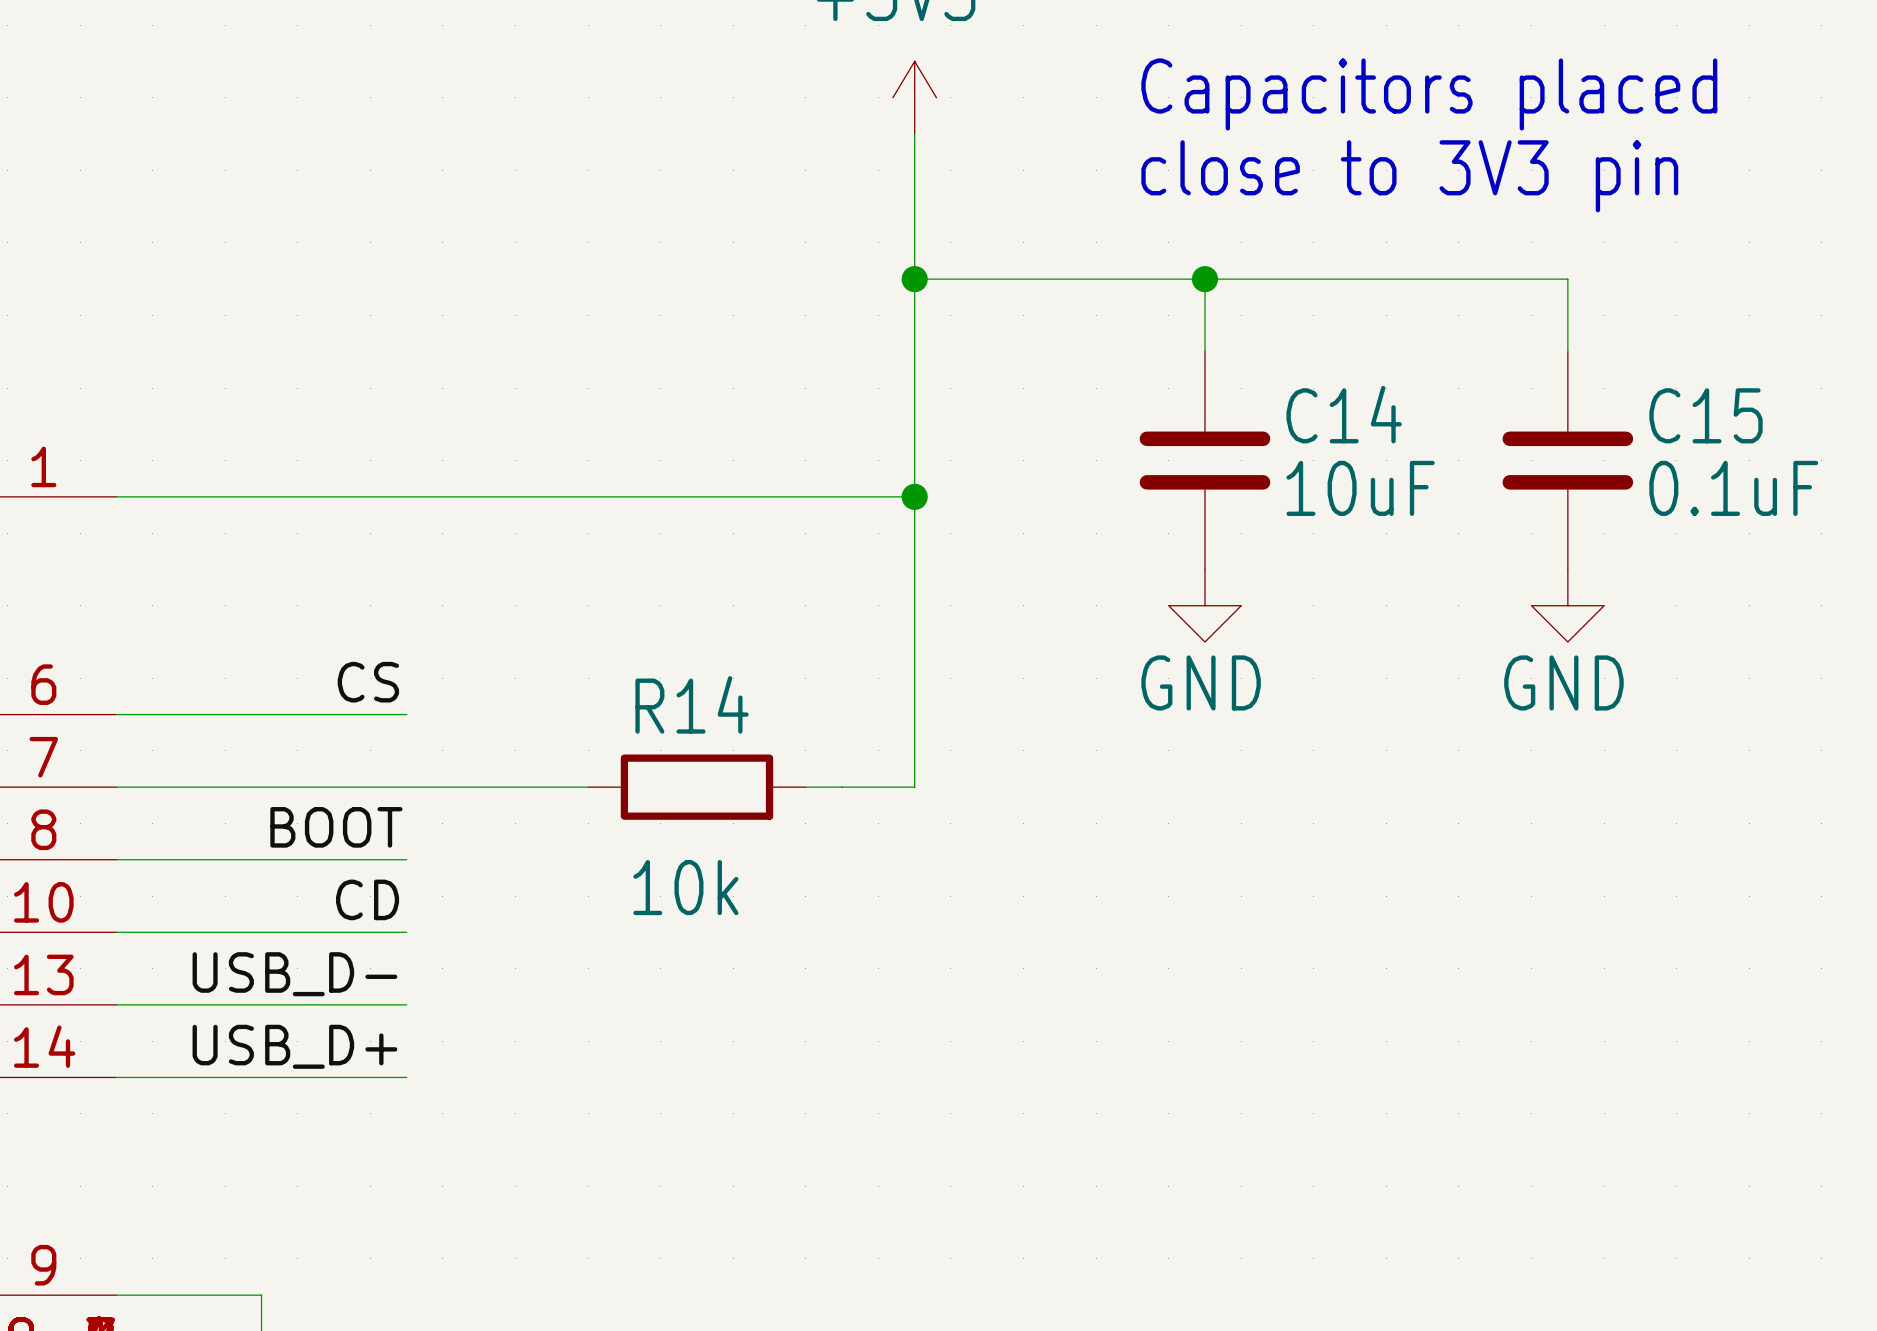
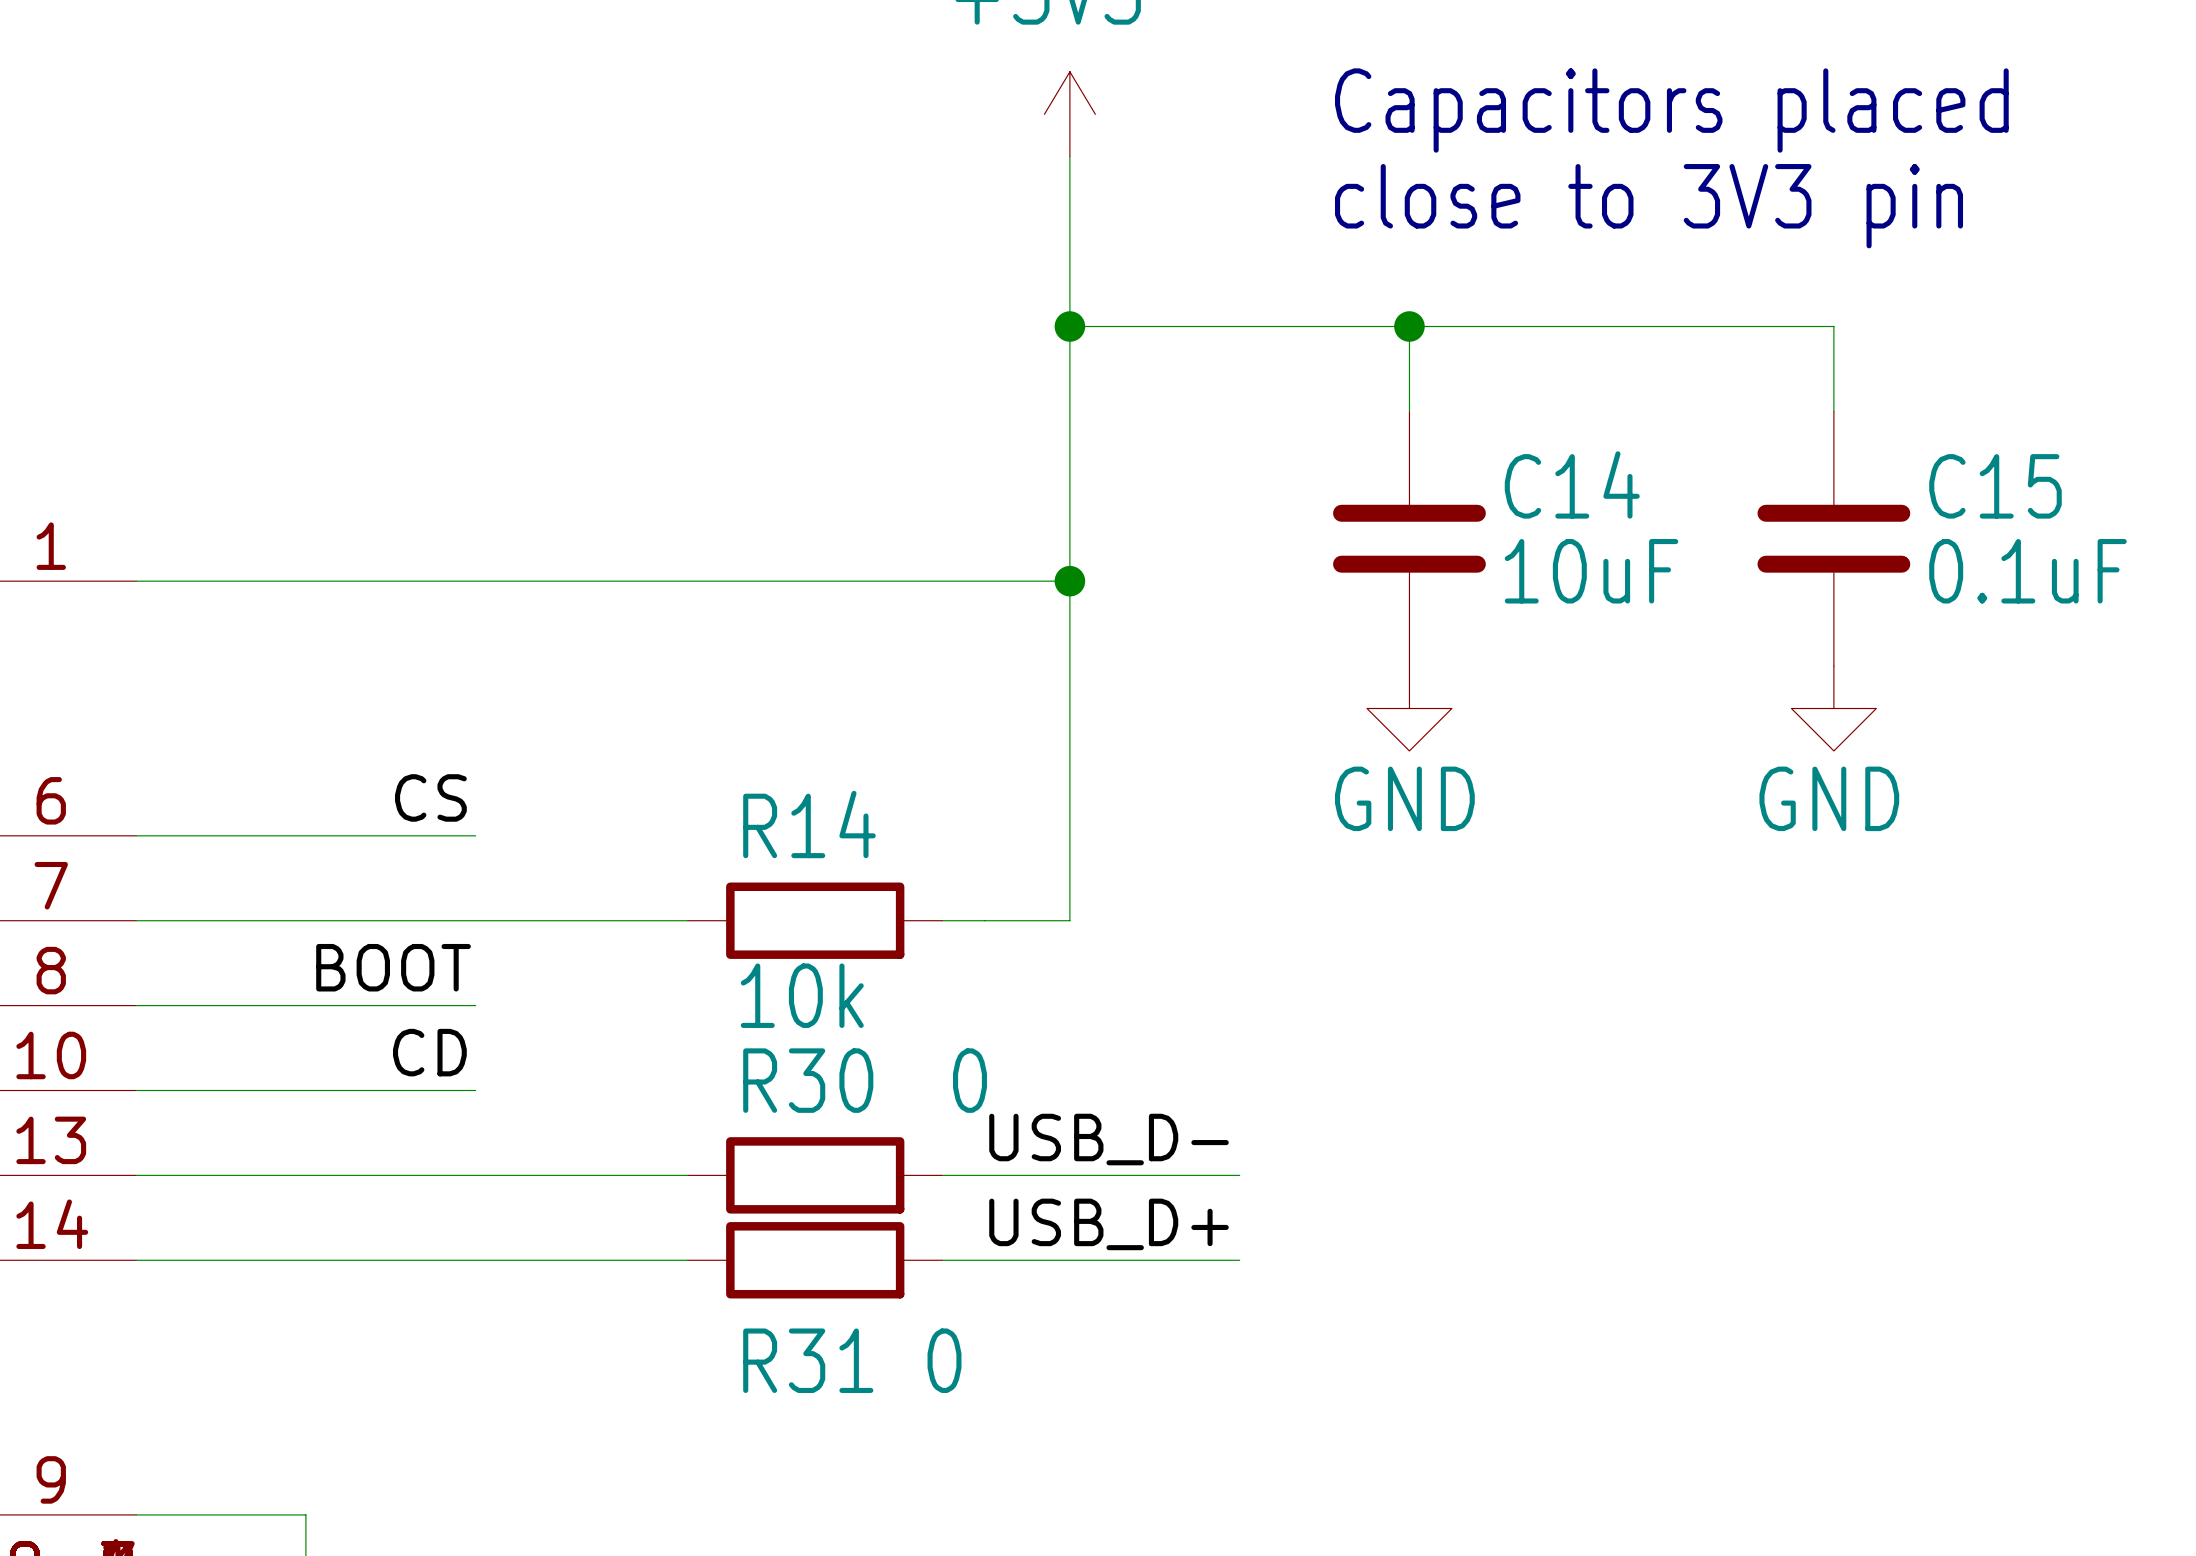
R14 value position: 10k (685, 887) -> 10k (802, 995)
label position: USB_D- (294, 974) -> USB_D- (1109, 1139)
wire: none -> (475, 1175) (687, 1175)
R30: none -> 0 (815, 1175)
wire: none -> (942, 1175) (1239, 1175)
label position: USB_D+ (294, 1046) -> USB_D+ (1109, 1224)
wire: none -> (475, 1260) (687, 1260)
R31: none -> 0 (815, 1260)
wire: none -> (942, 1260) (1239, 1260)

